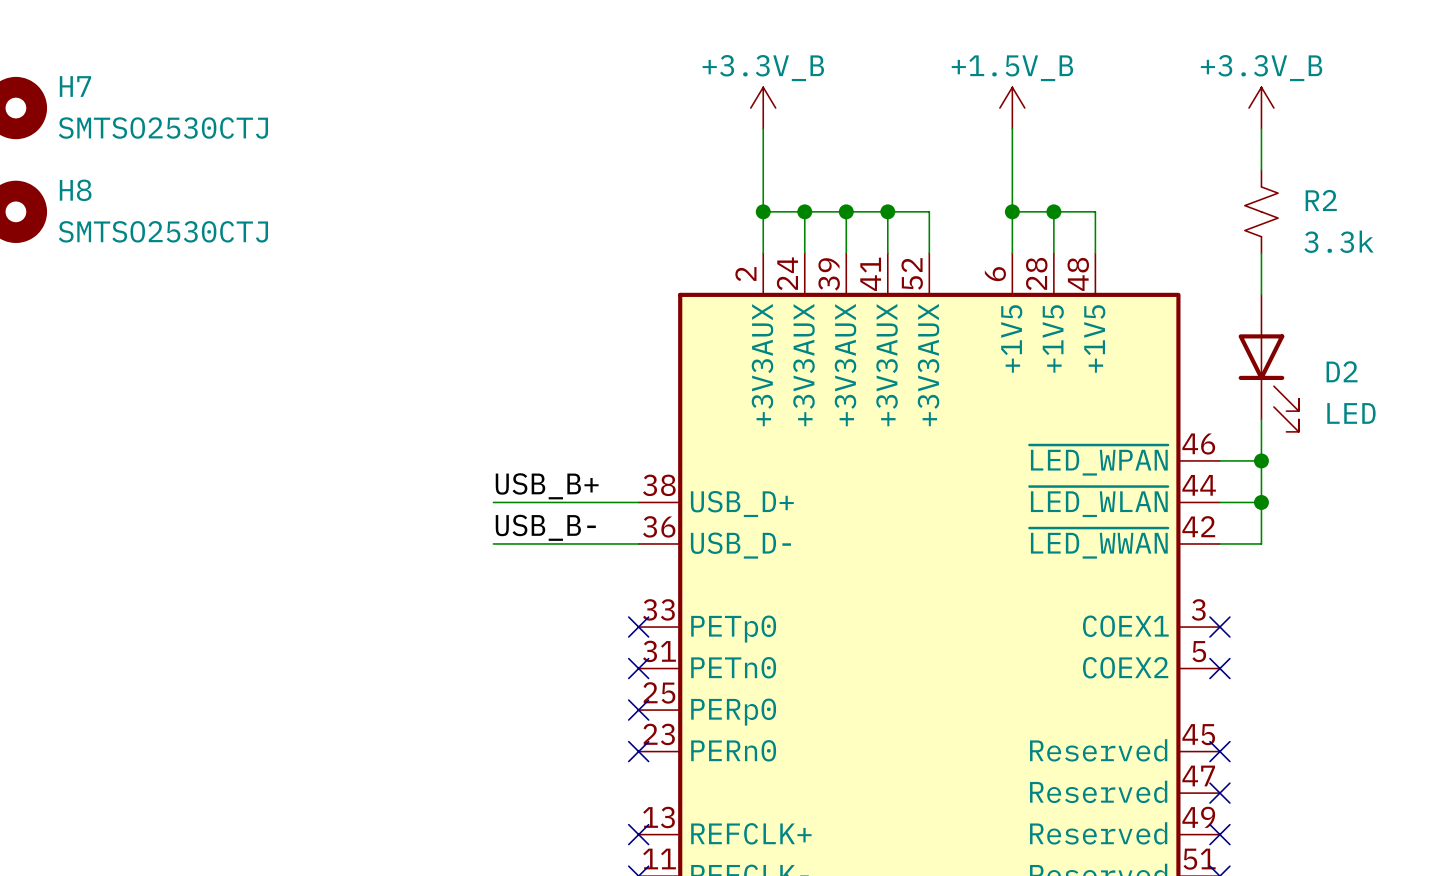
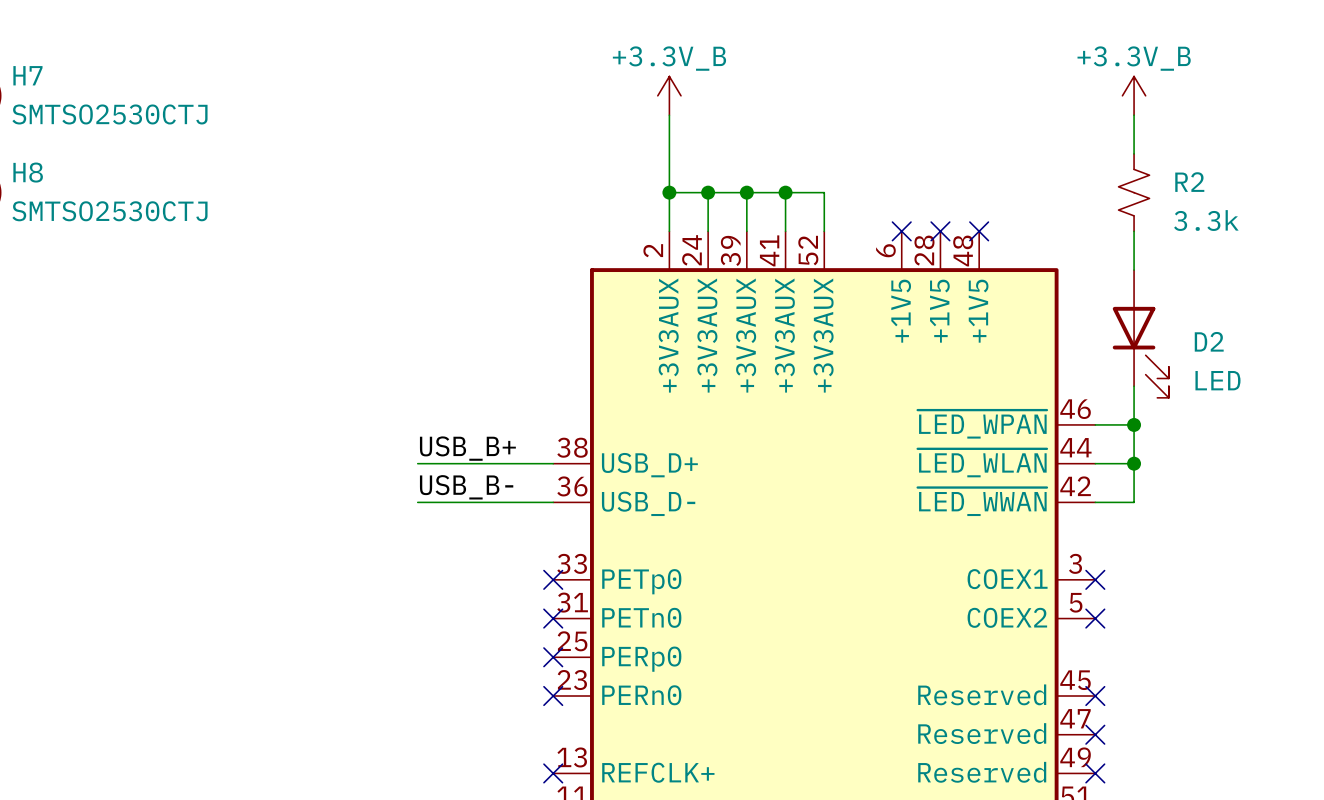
power symbol: +1.5V_B (1012, 108) -> none
wire: (1012, 128) (1012, 253) -> none
wire: (1012, 211) (1095, 211) (1095, 253) -> none
junction: (1012, 211) -> none
wire: (1053, 211) (1053, 253) -> none
junction: (1053, 211) -> none
no-connect mark: none -> (901, 231)
no-connect mark: none -> (940, 231)
no-connect mark: none -> (979, 231)

